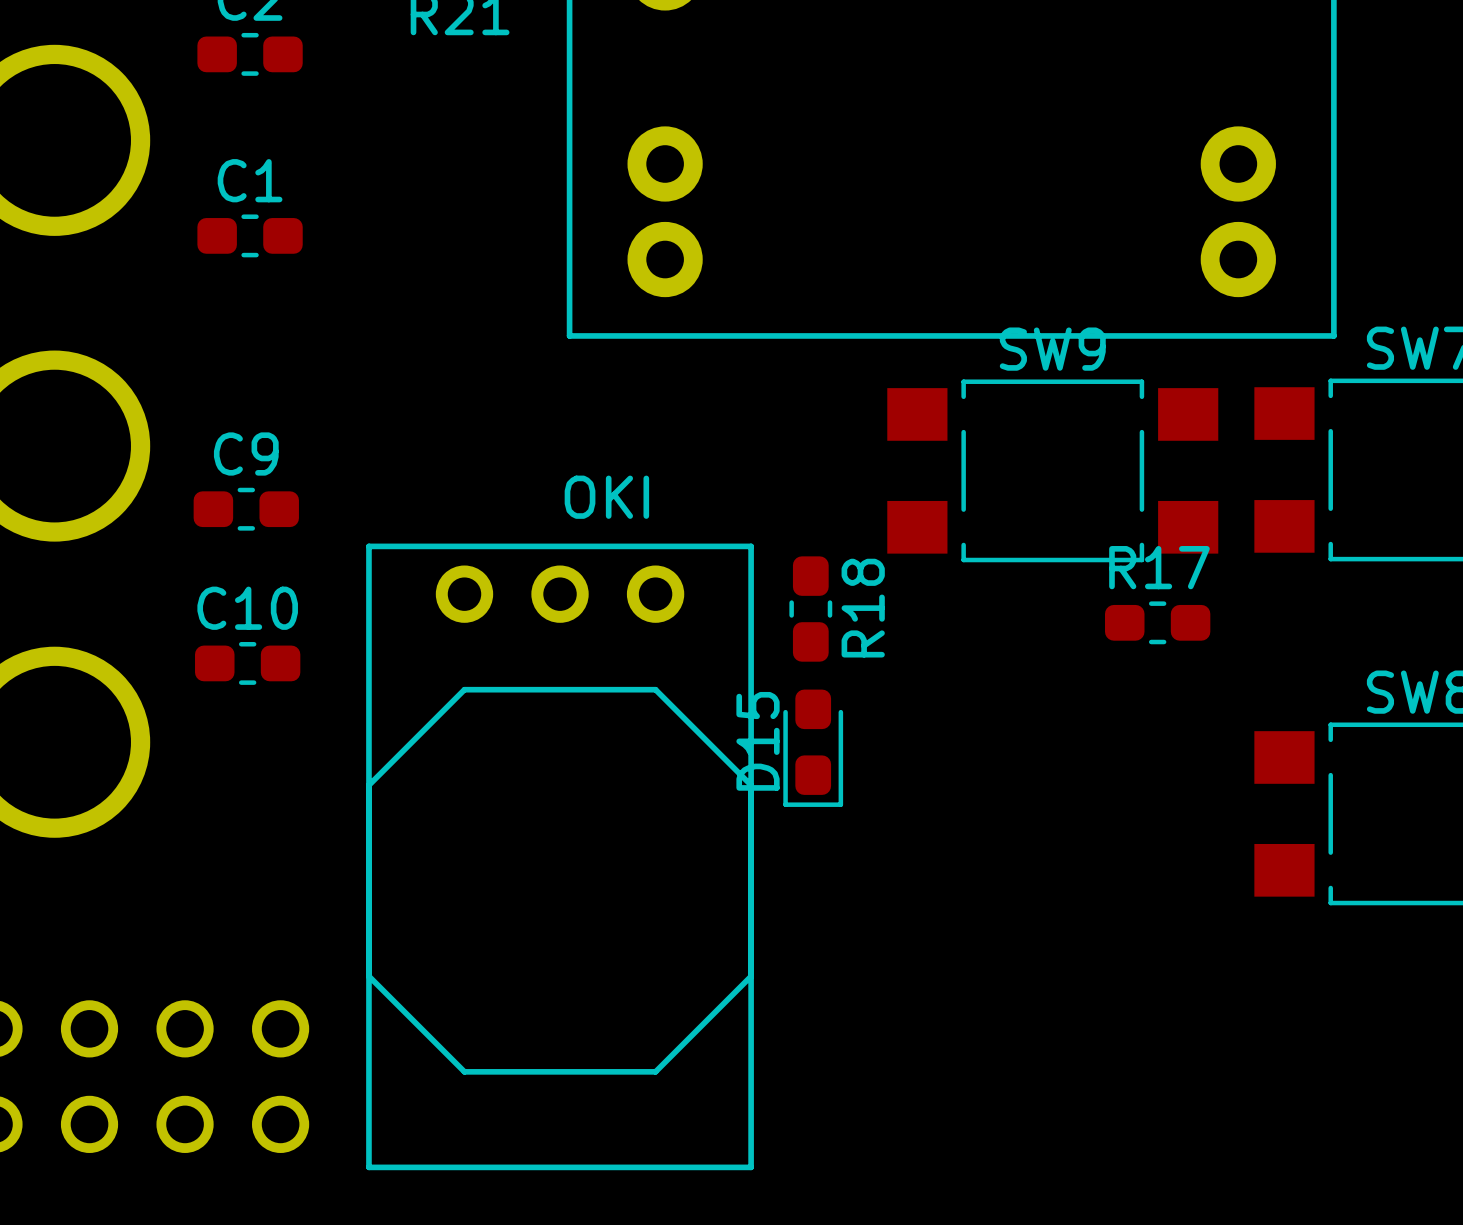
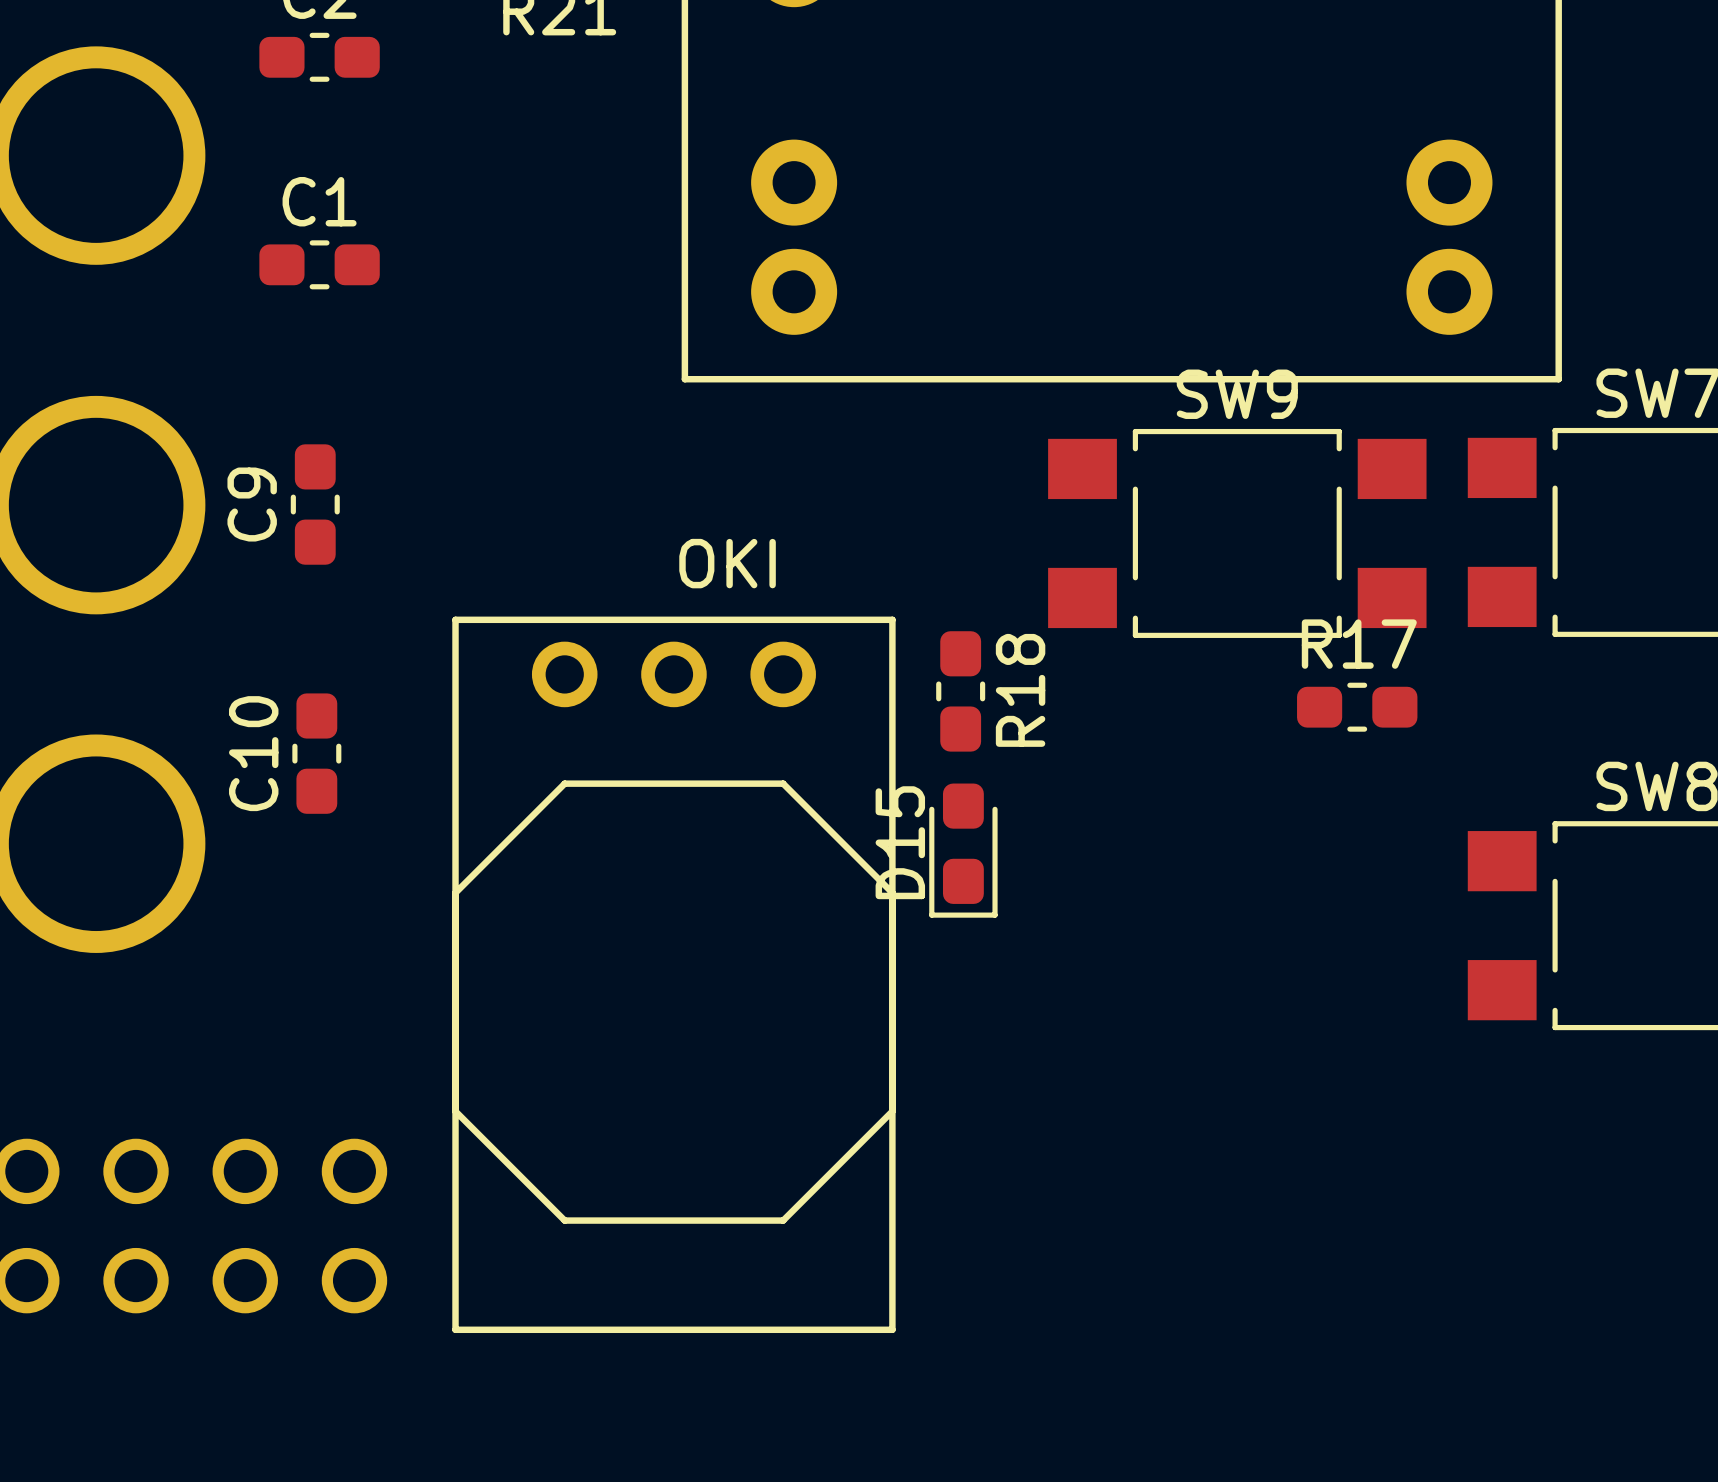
C9 name position: C9 (246, 454) -> C9 (252, 504)
C9 rotation: 0° (246, 509) -> 90° clockwise (315, 504)
C9 position: (246, 509) -> (315, 504)
C10 name position: C10 (247, 608) -> C10 (253, 753)
C10 rotation: 0° (247, 663) -> 90° clockwise (316, 753)

